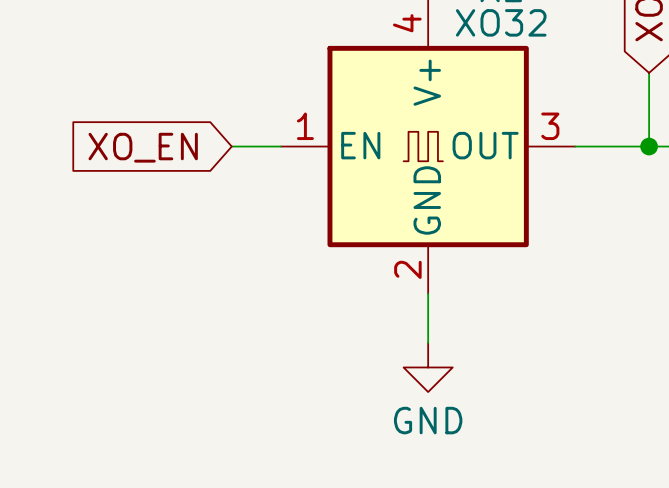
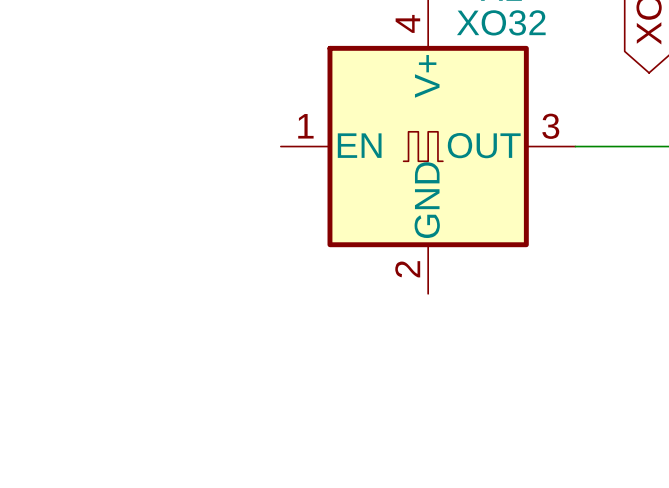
wire: (649, 72) (649, 146) -> none
wire: (231, 146) (280, 146) -> none
junction: (649, 146) -> none
global label: XO_EN (143, 147) -> none
wire: (428, 293) (428, 342) -> none
power symbol: GND (428, 367) -> none

